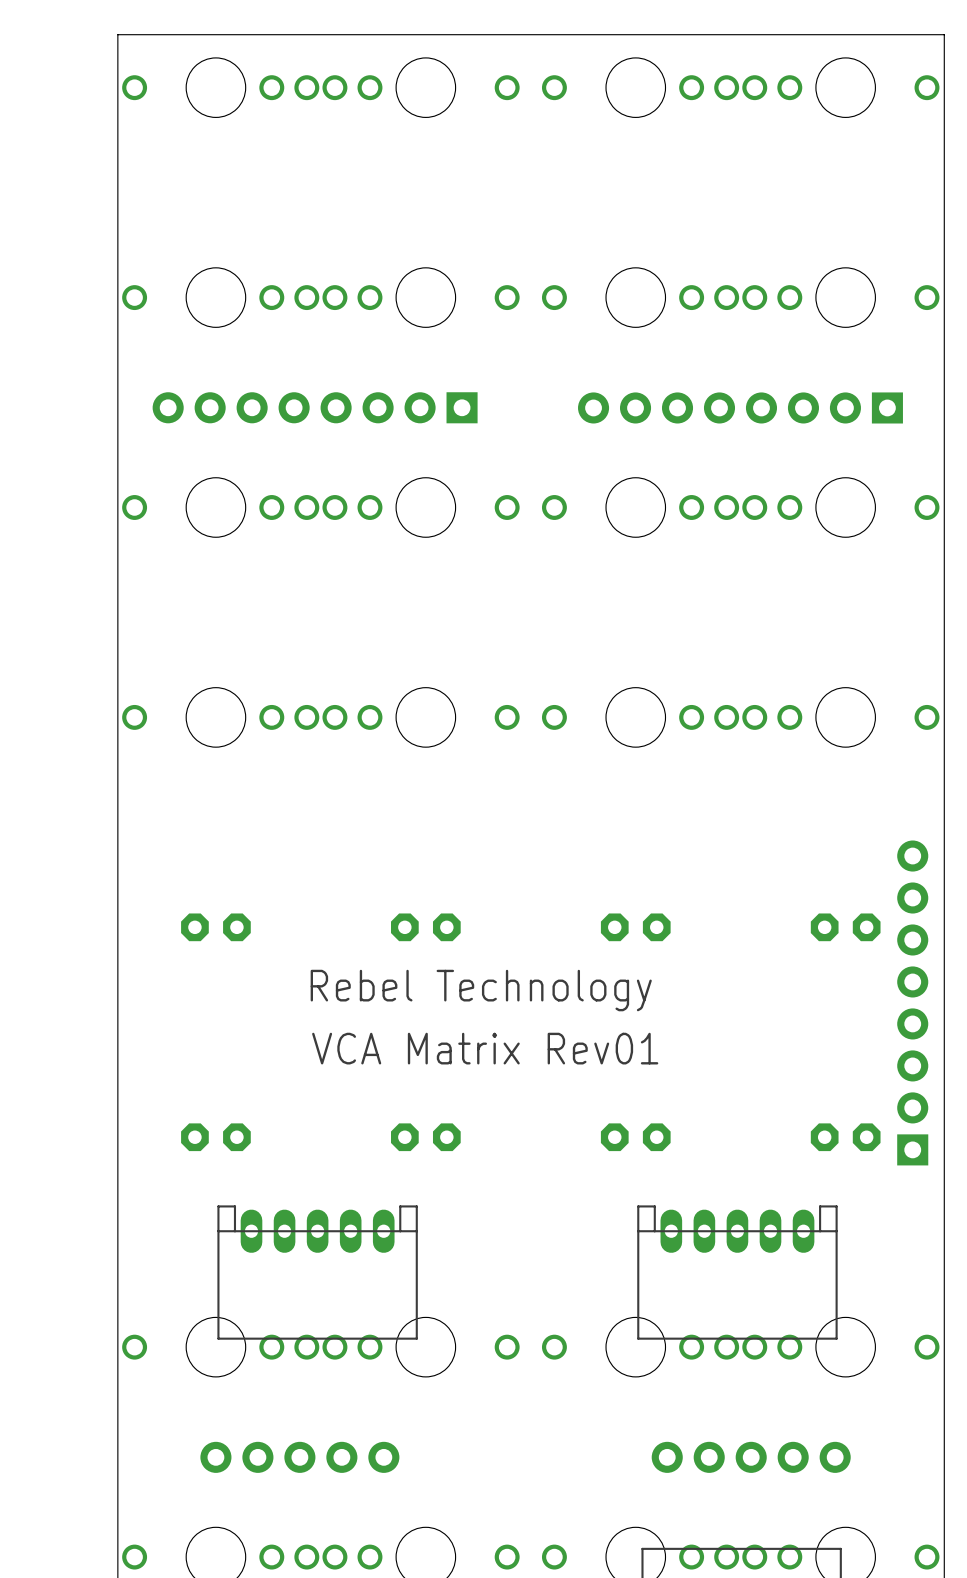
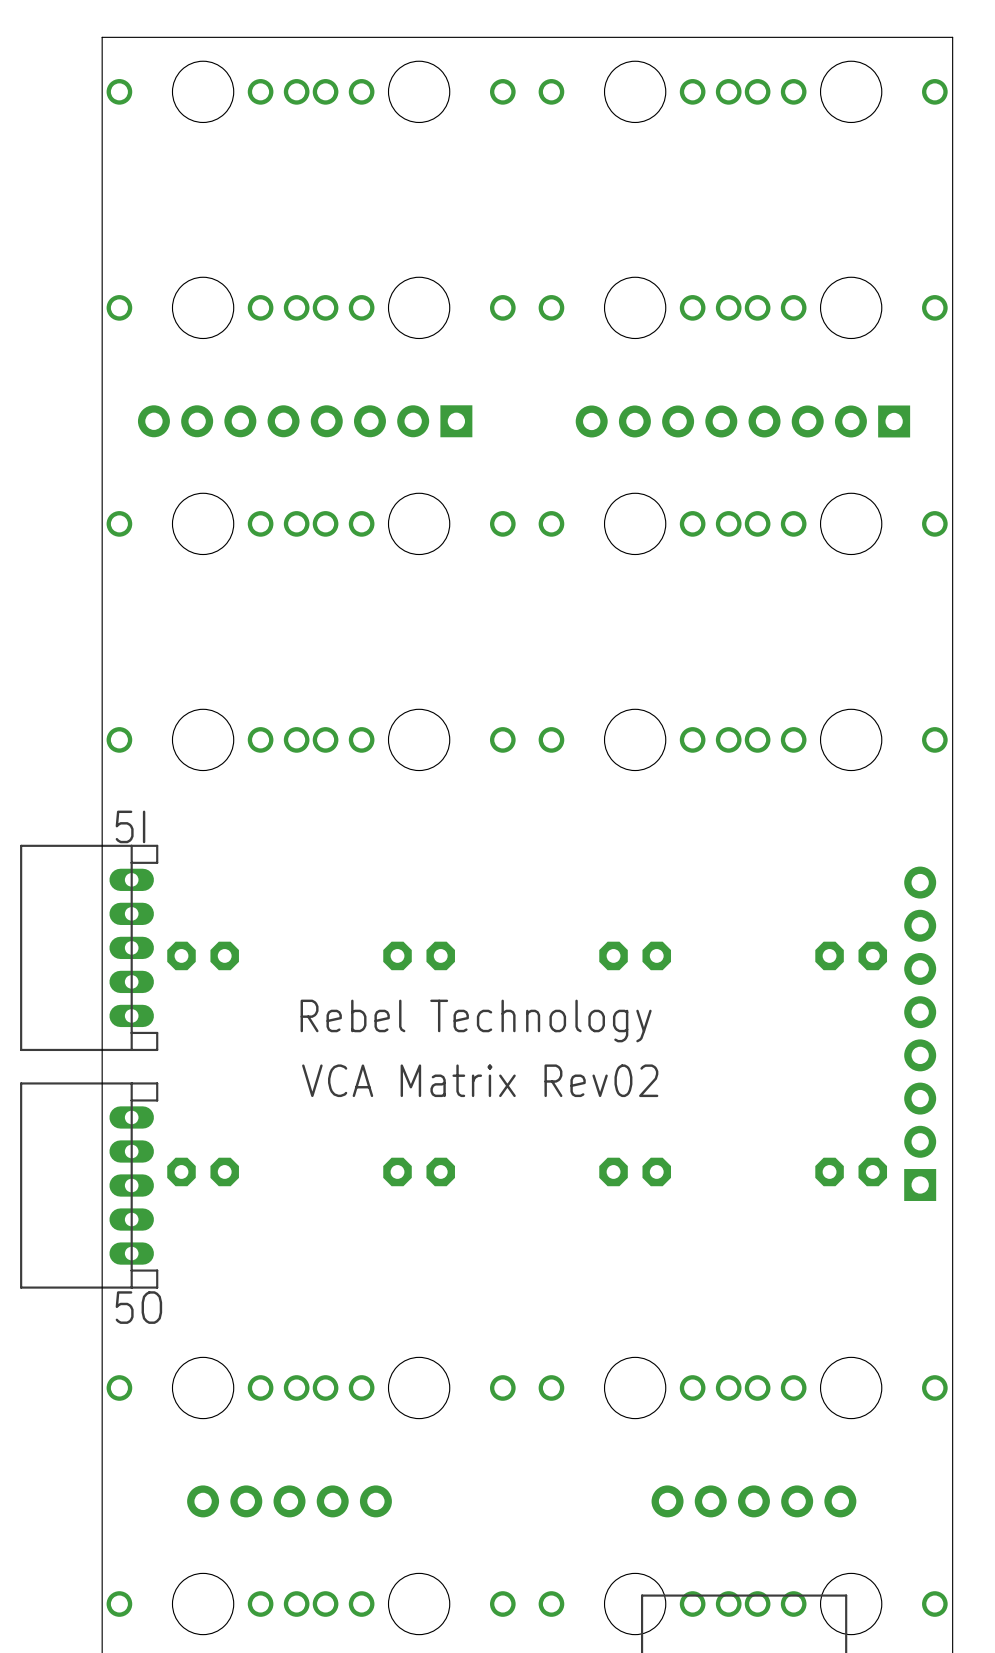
text: none -> 5I (130, 826)
part: none -> (89, 947)
text: VCA Matrix Rev01 (485, 1048) -> VCA Matrix Rev02 (480, 1080)
part: none -> (89, 1185)
text: none -> 5O (138, 1307)
part: (317, 1272) -> none
part: (737, 1272) -> none

